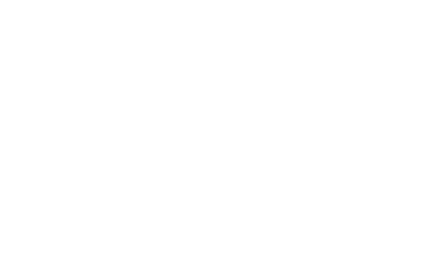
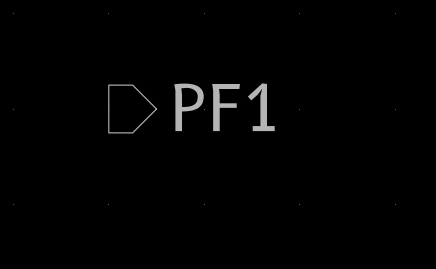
hierarchical label: none -> PF1 (224, 107)

